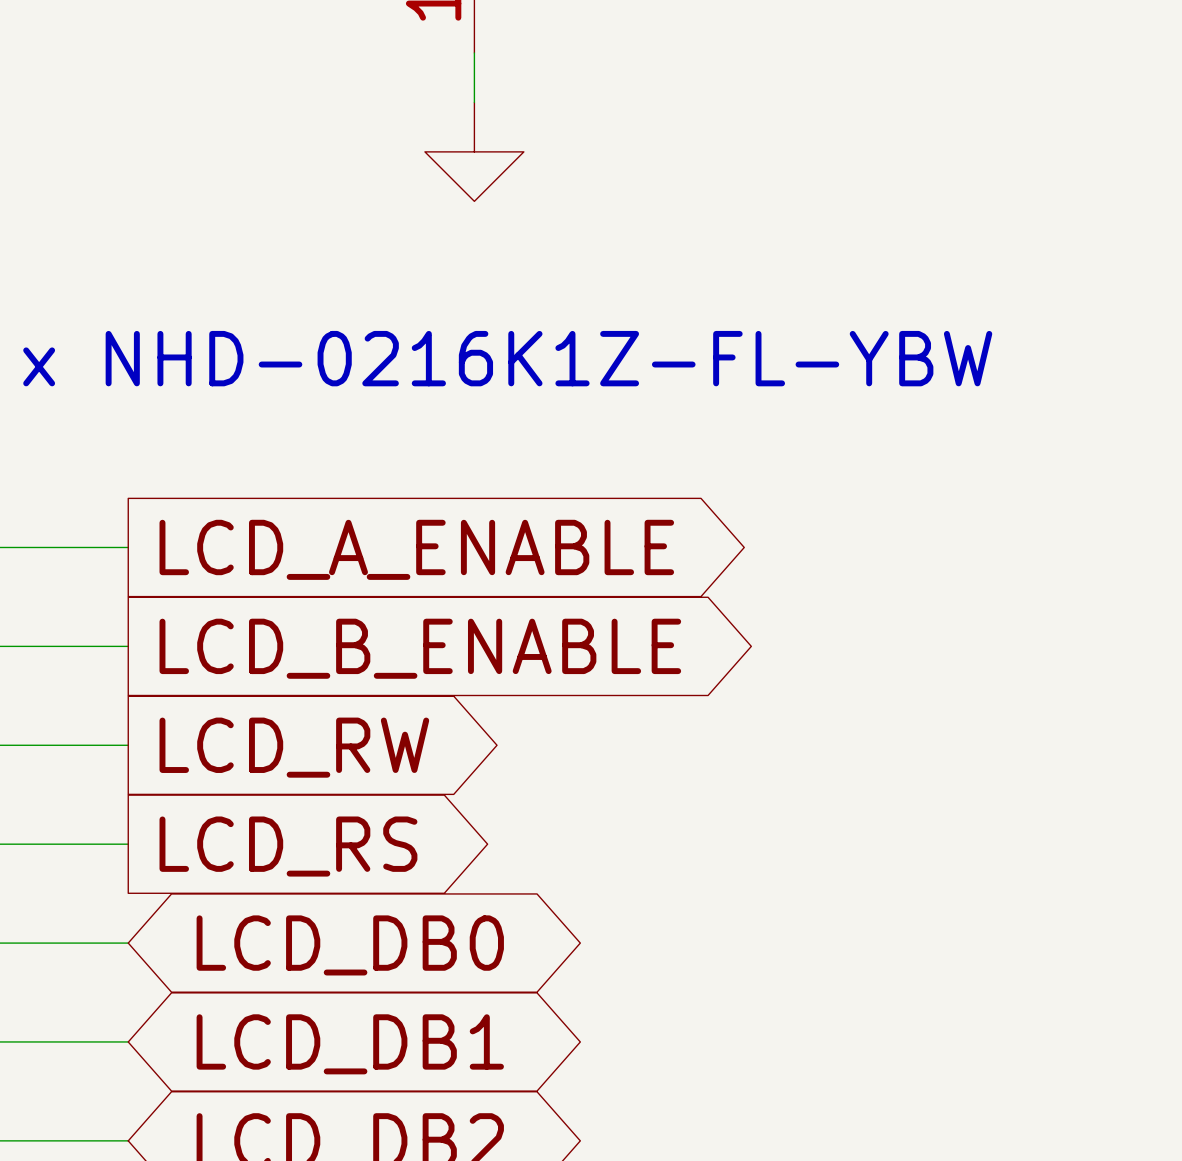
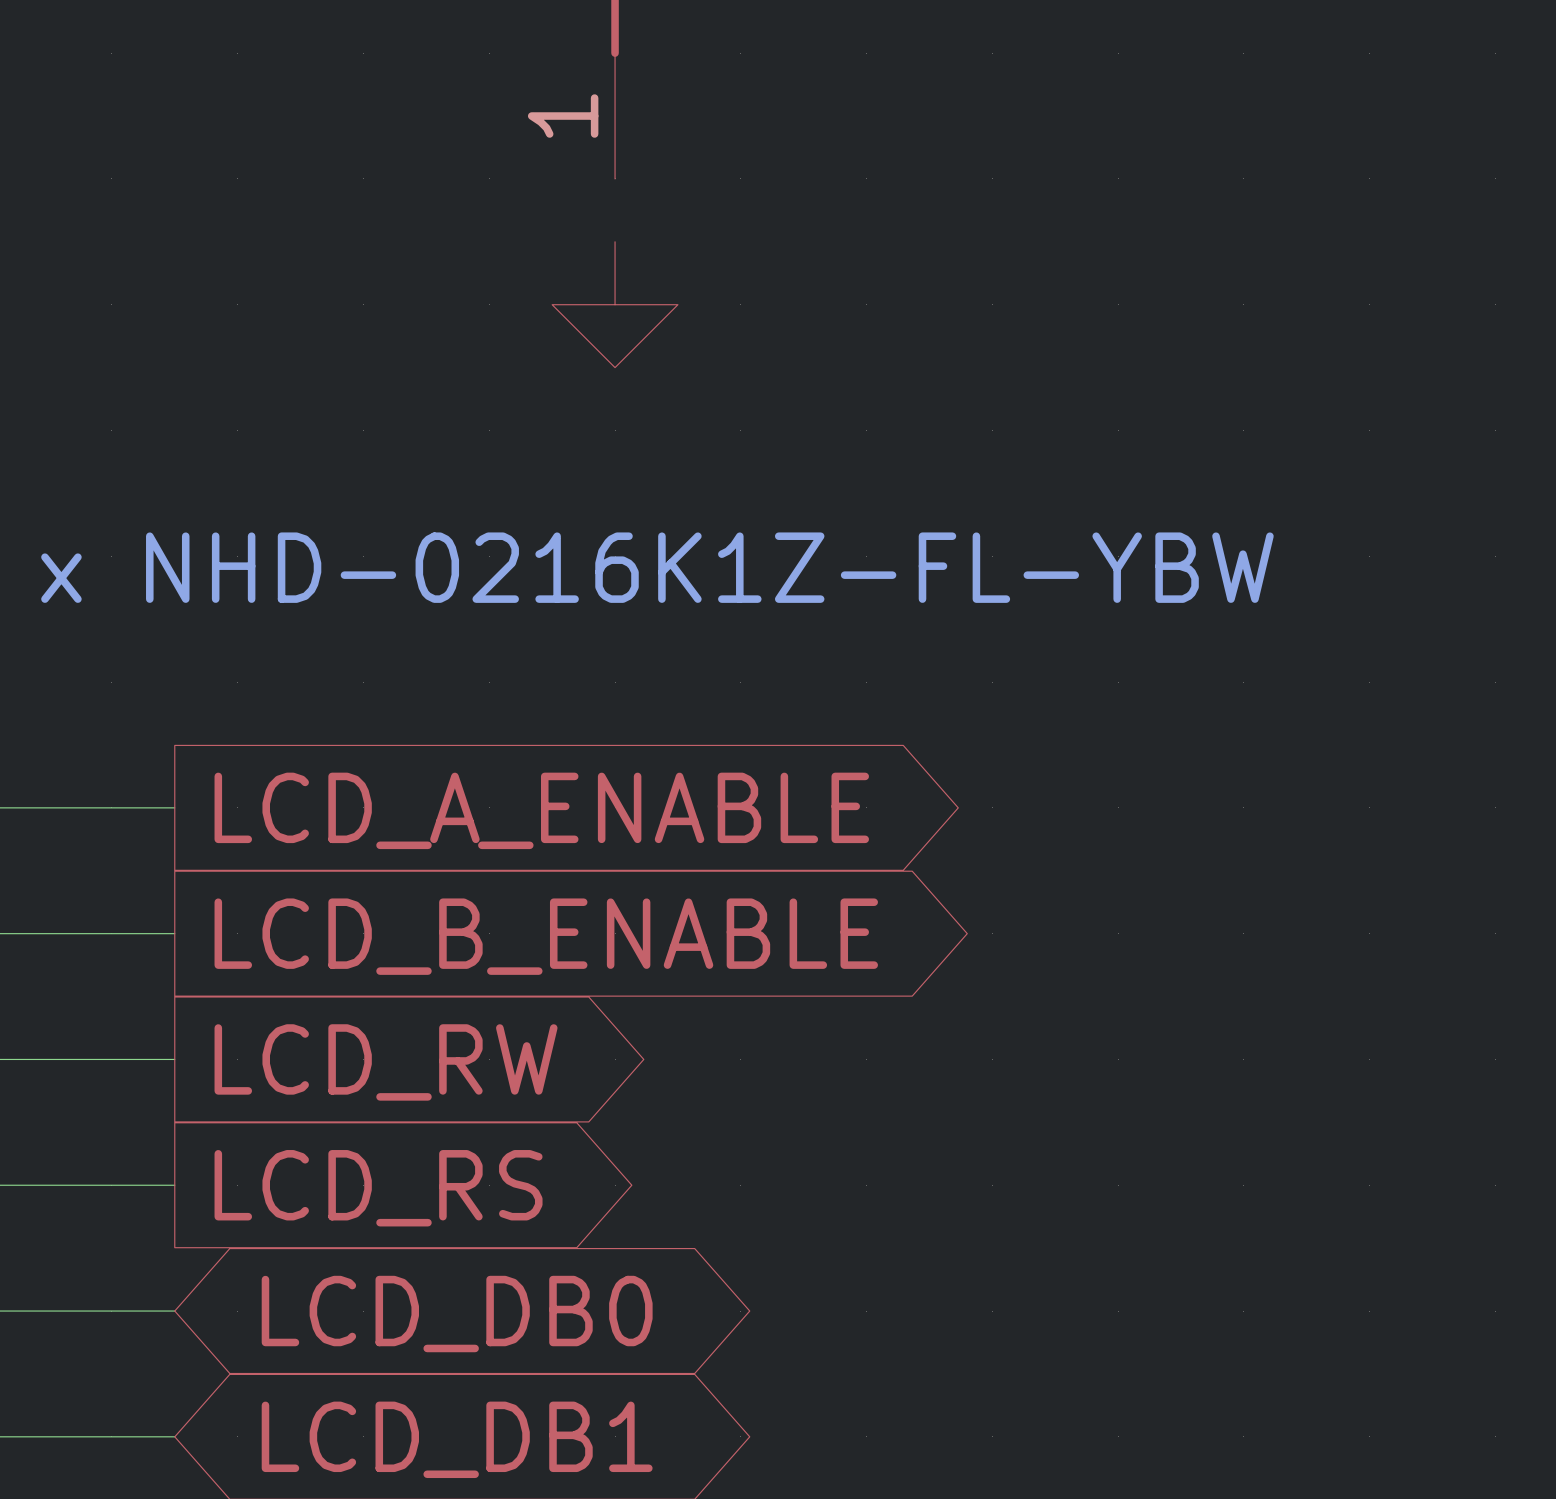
wire: (474, 52) (474, 102) -> none

